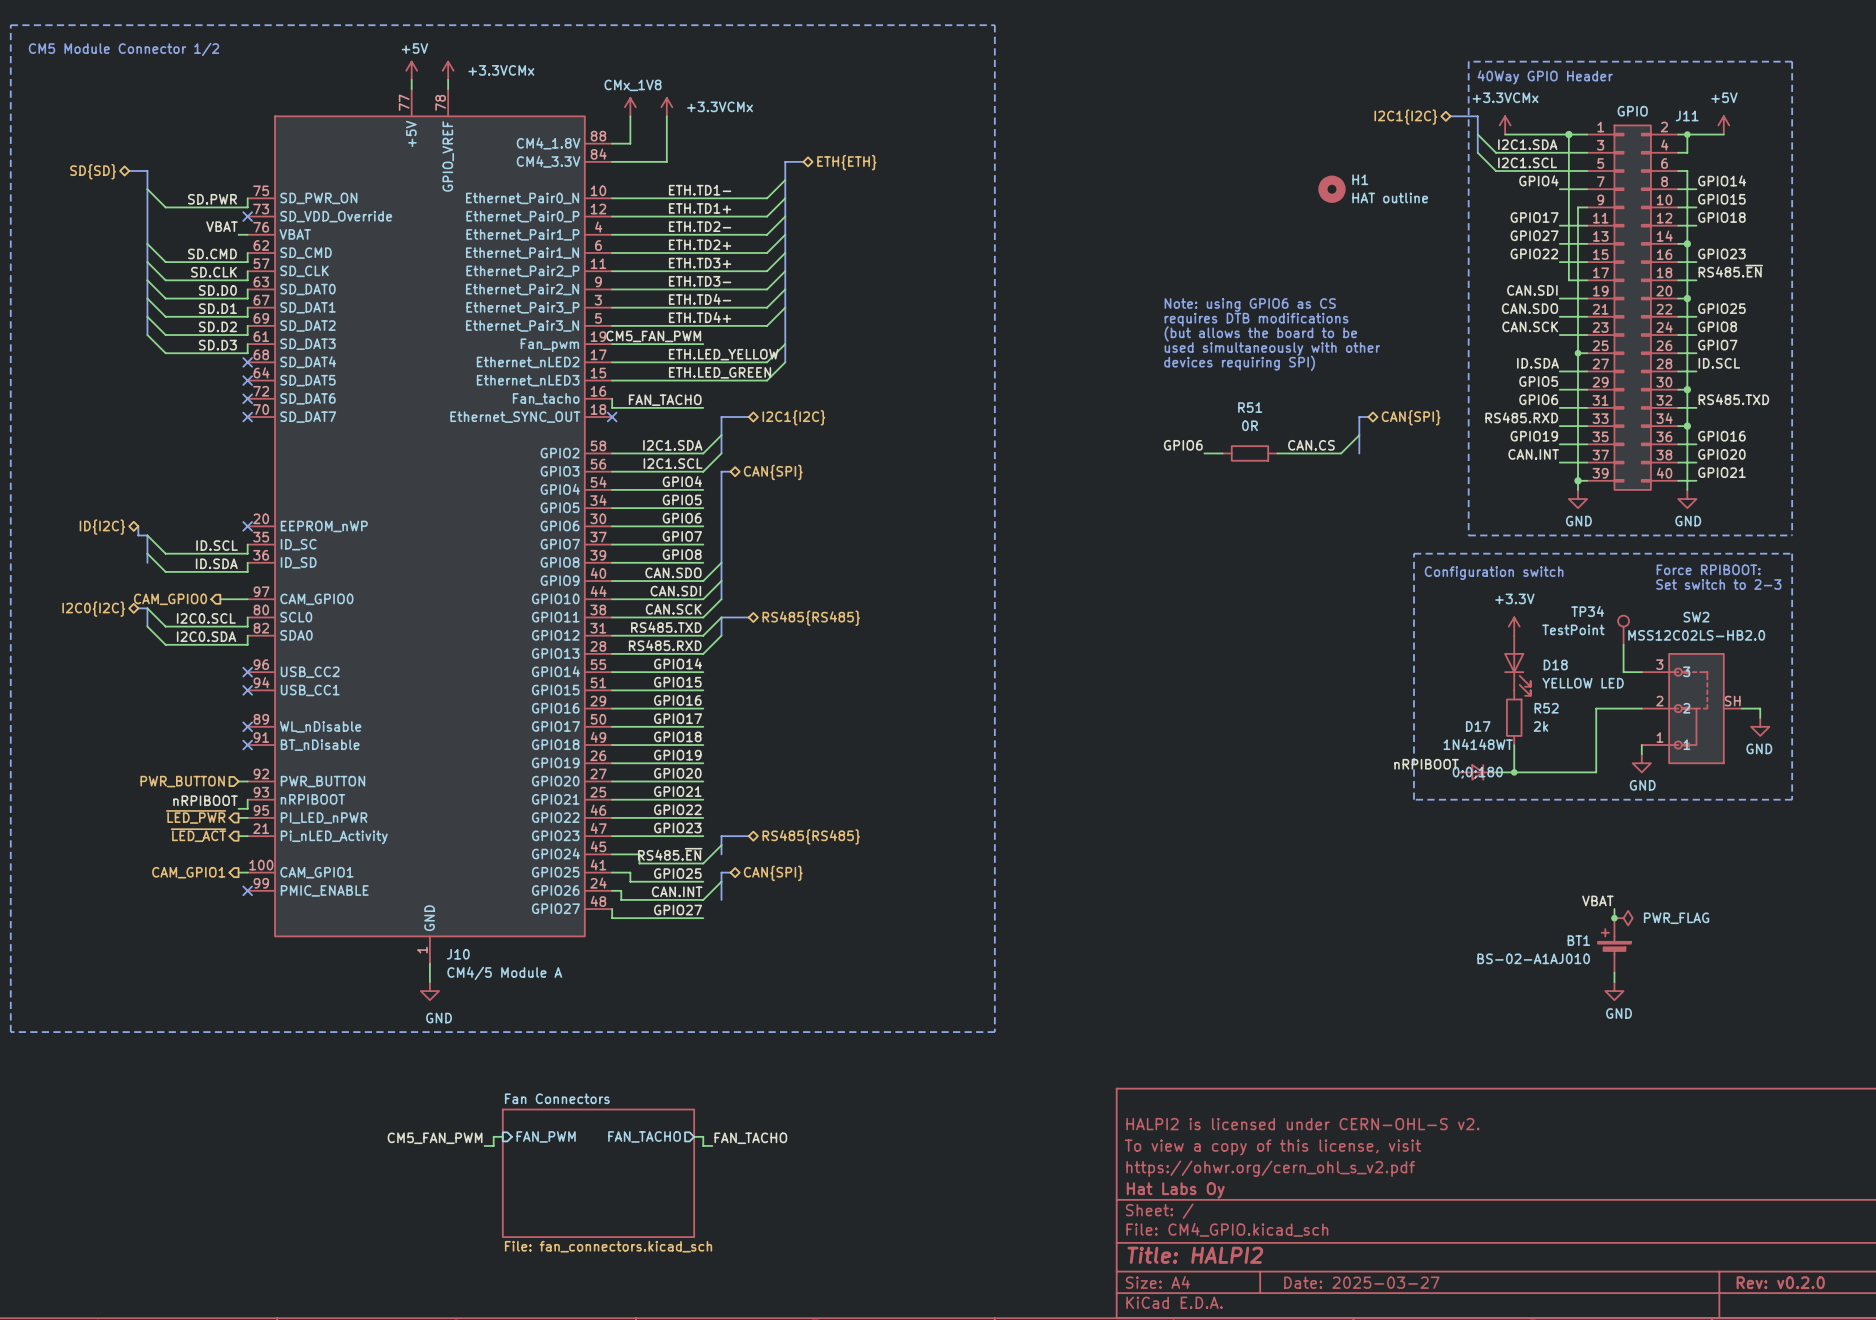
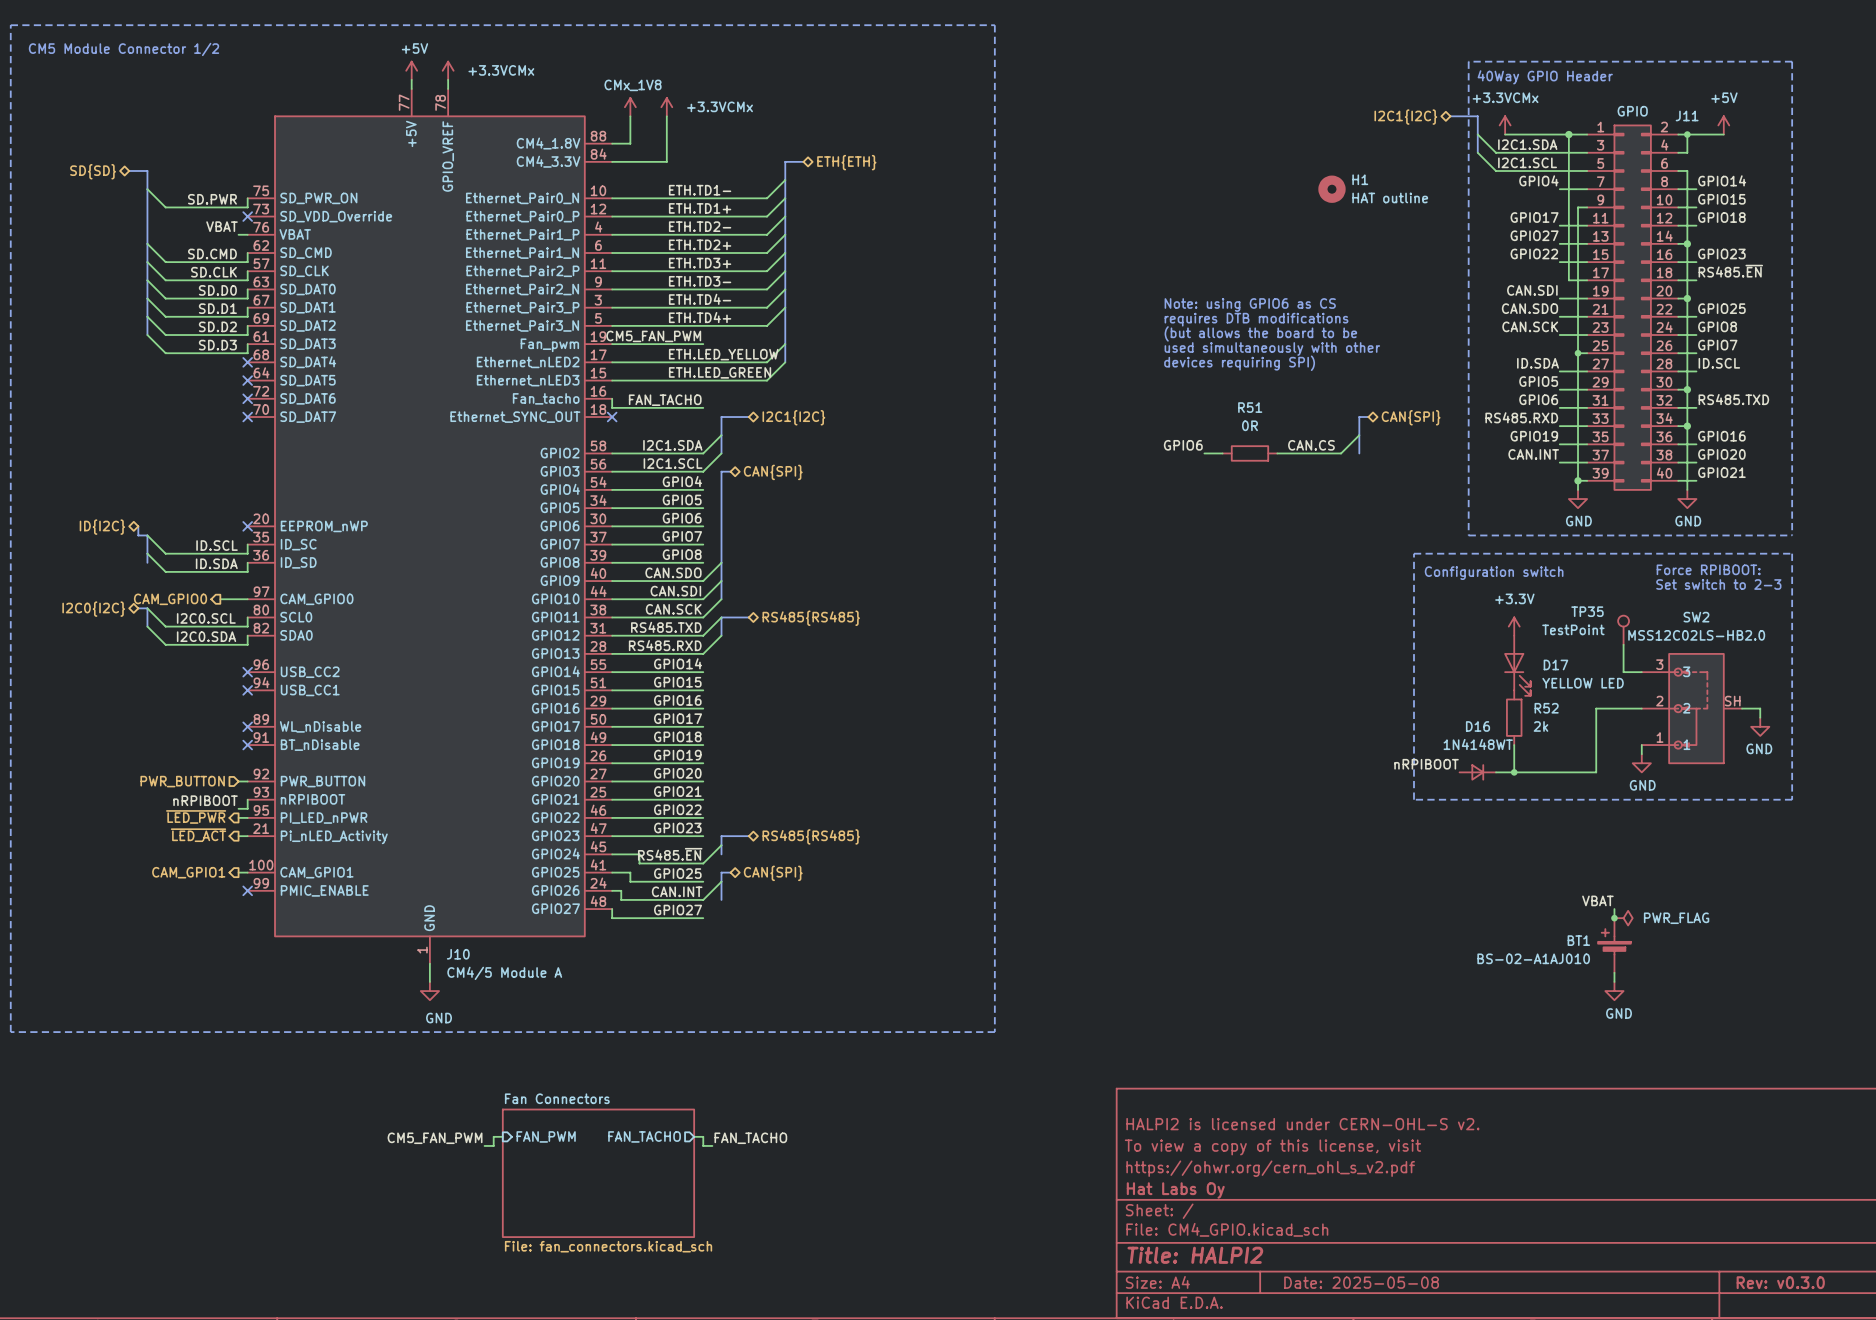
TP34 name: TP34 (1587, 611) -> TP35 (1587, 611)
D18 name: D18 (1555, 664) -> D17 (1555, 664)
D17 name: D17 (1478, 726) -> D16 (1478, 726)
D17 text: 0;0;180 (1477, 772) -> none
title block: Date: 2025-03-27 (1361, 1282) -> Date: 2025-05-08 (1361, 1282)
title block: Rev: v0.2.0 (1780, 1282) -> Rev: v0.3.0 (1780, 1282)

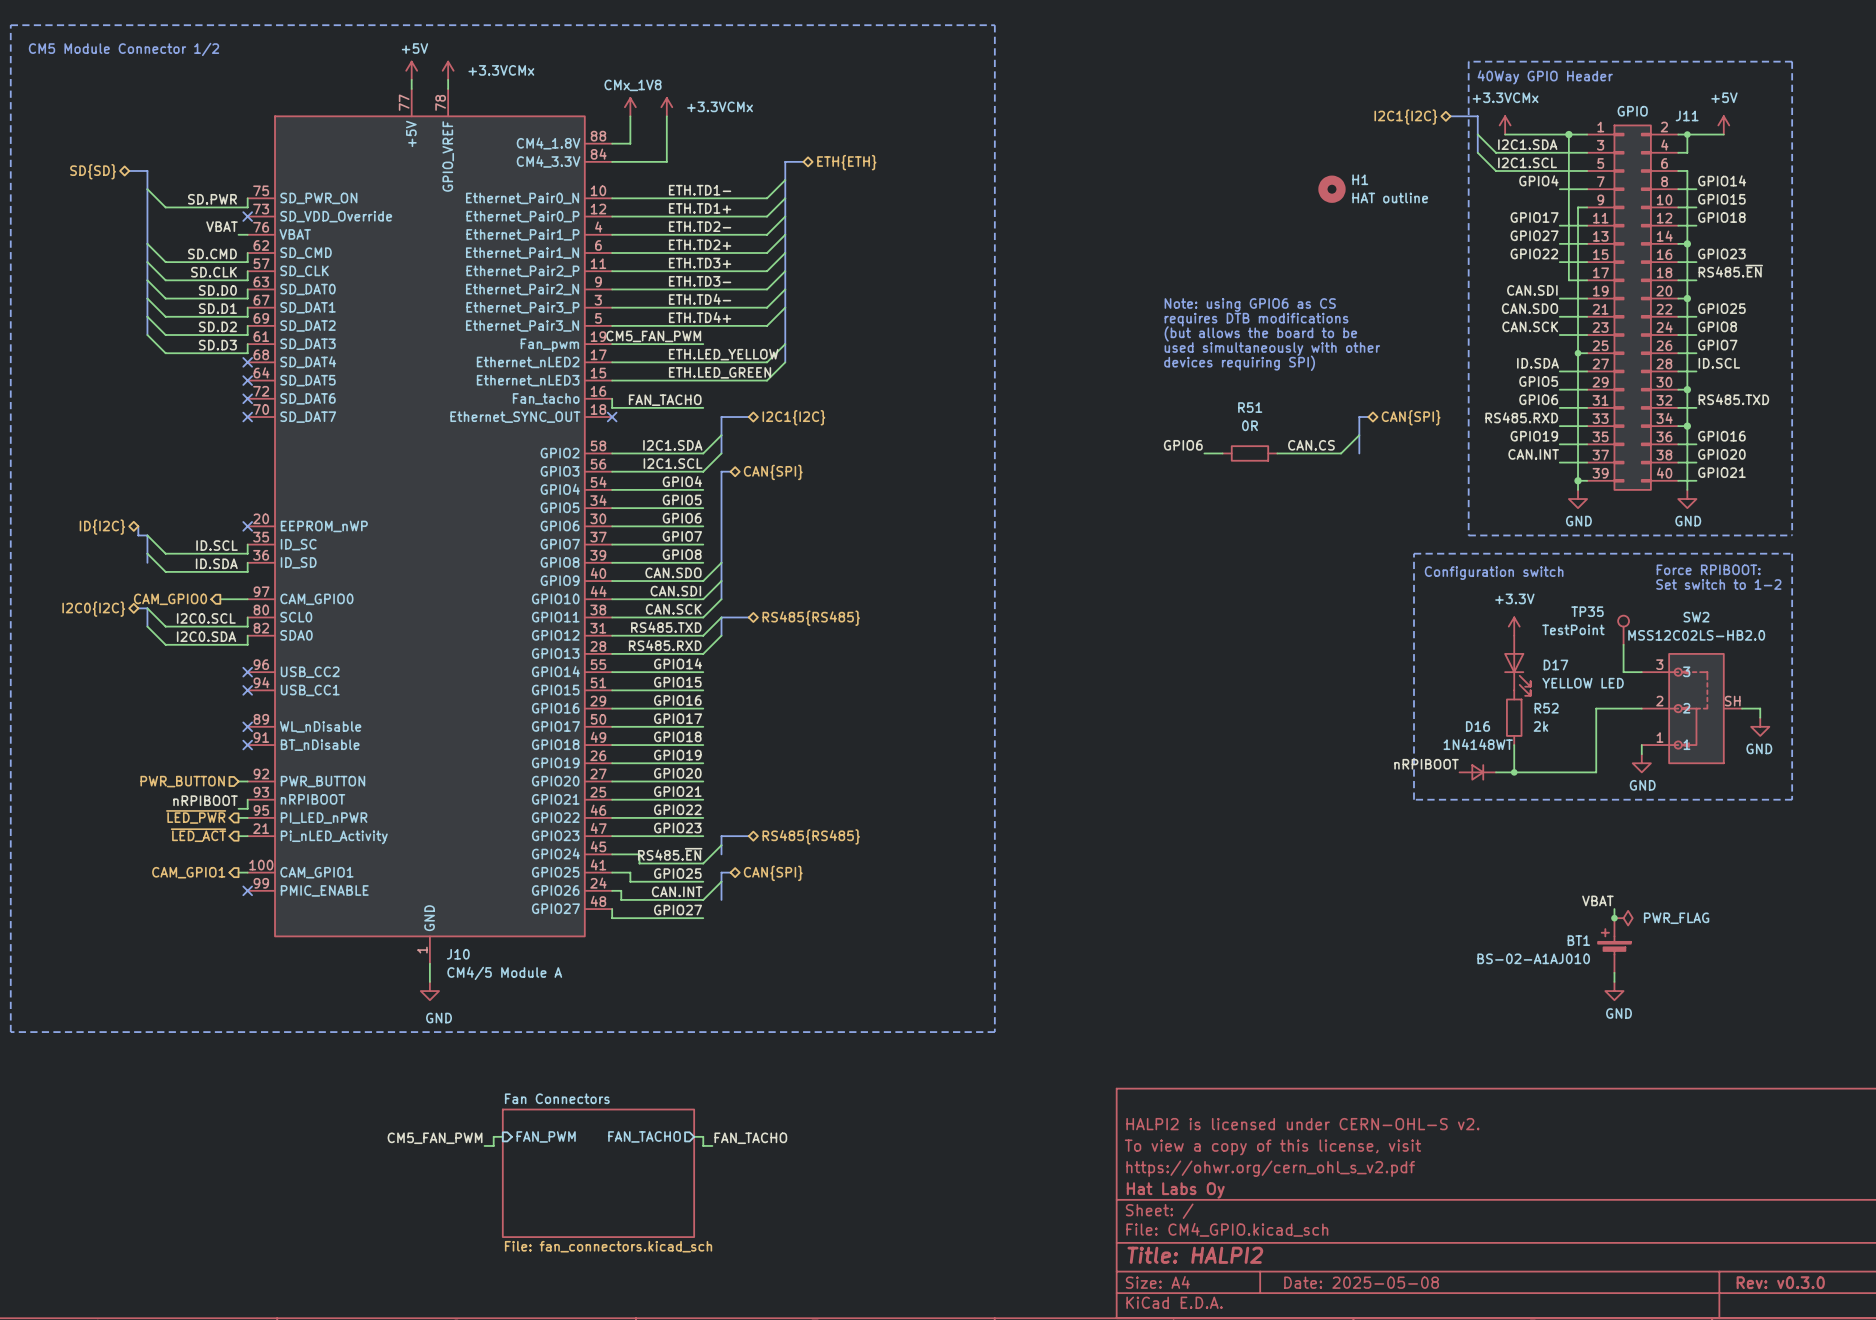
text: Set switch to 2-3 (1718, 584) -> Set switch to 1-2 (1718, 584)

